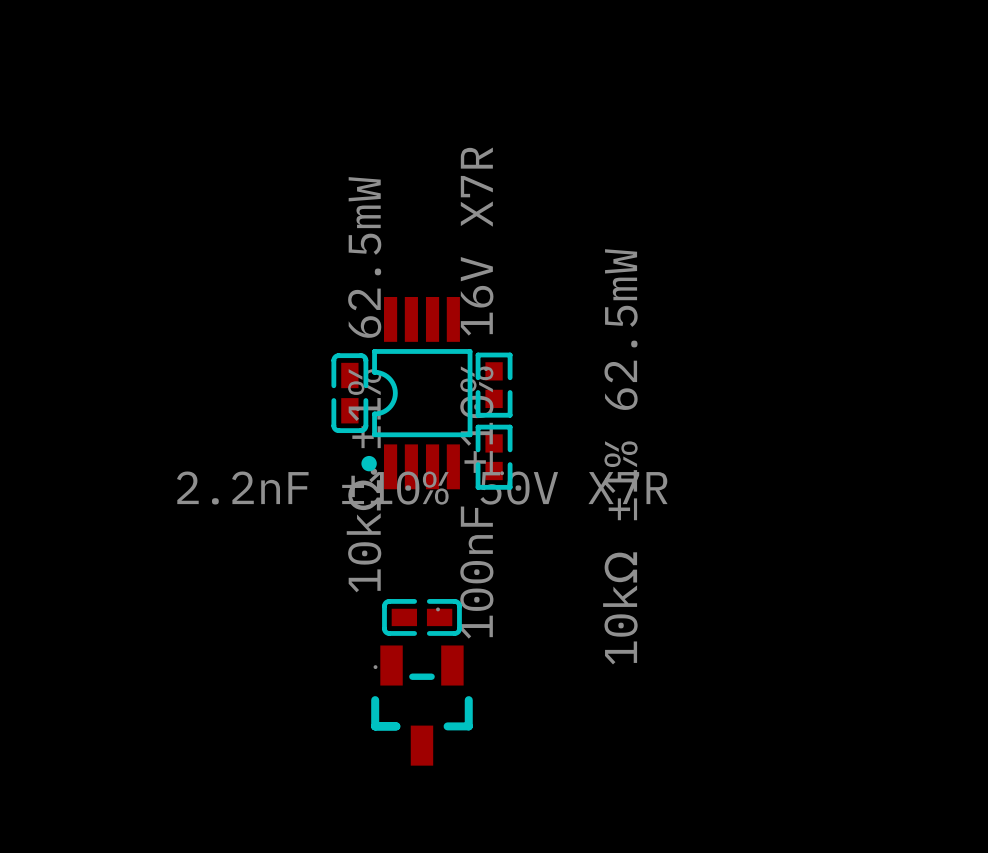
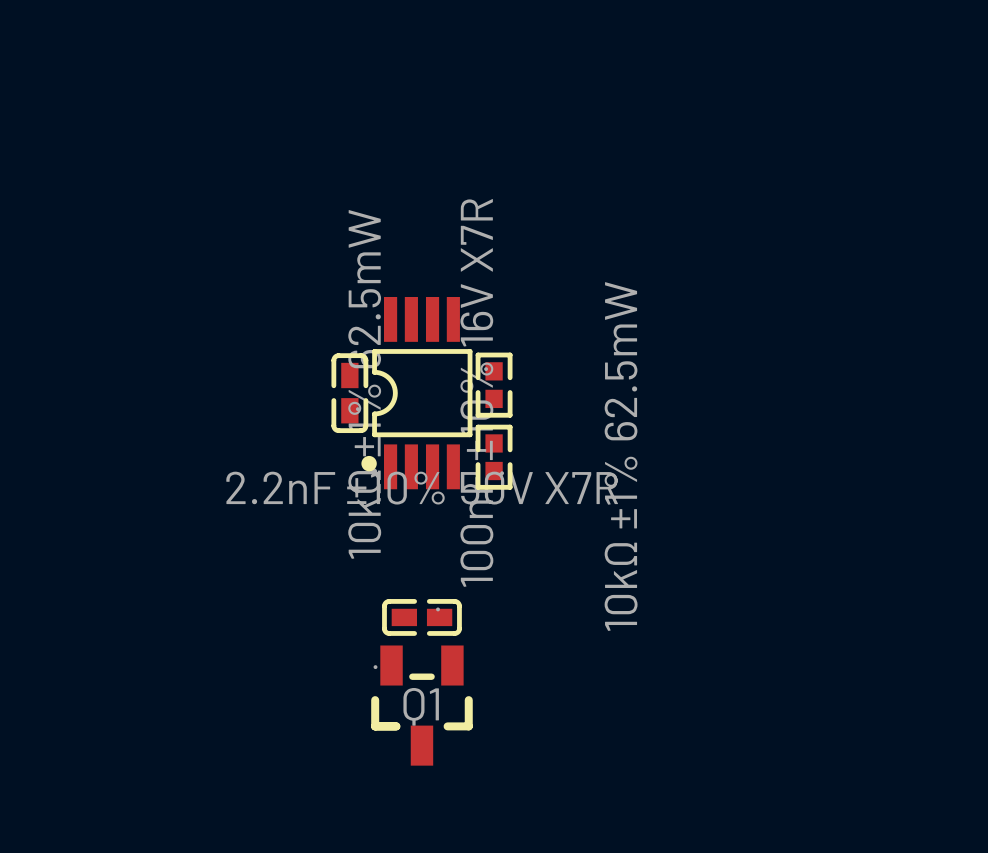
Q1 name: none -> Q1 (421, 706)

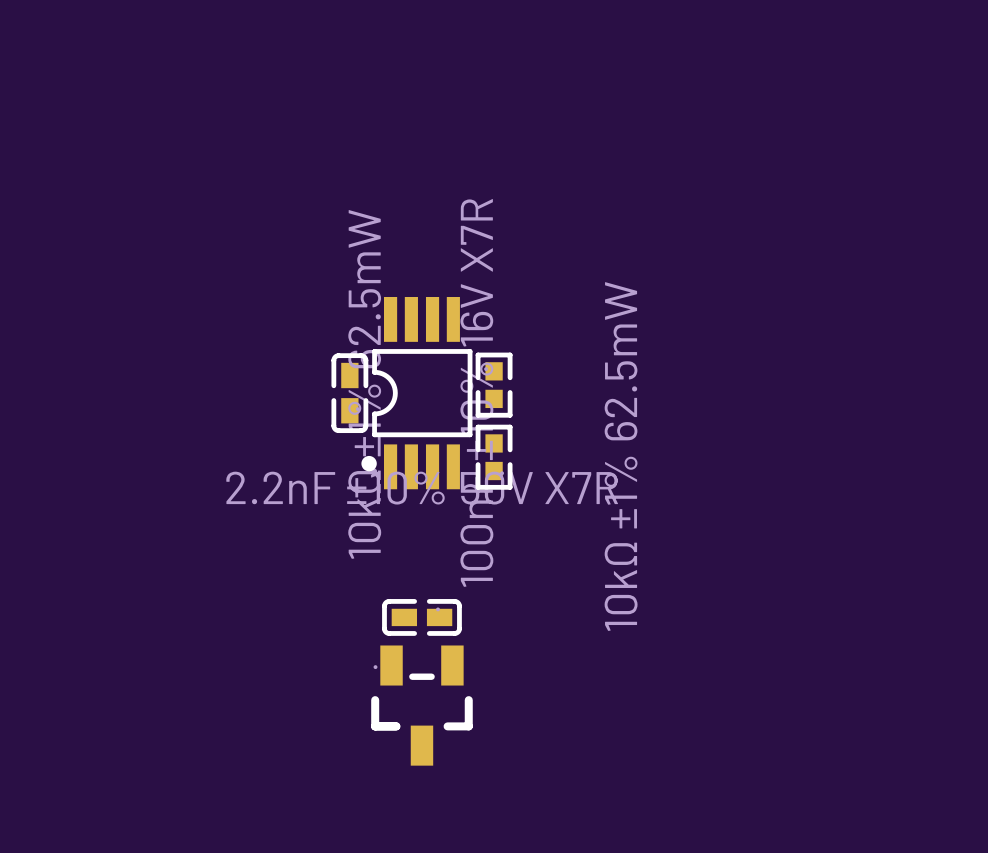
Q1 name: Q1 (421, 706) -> none

